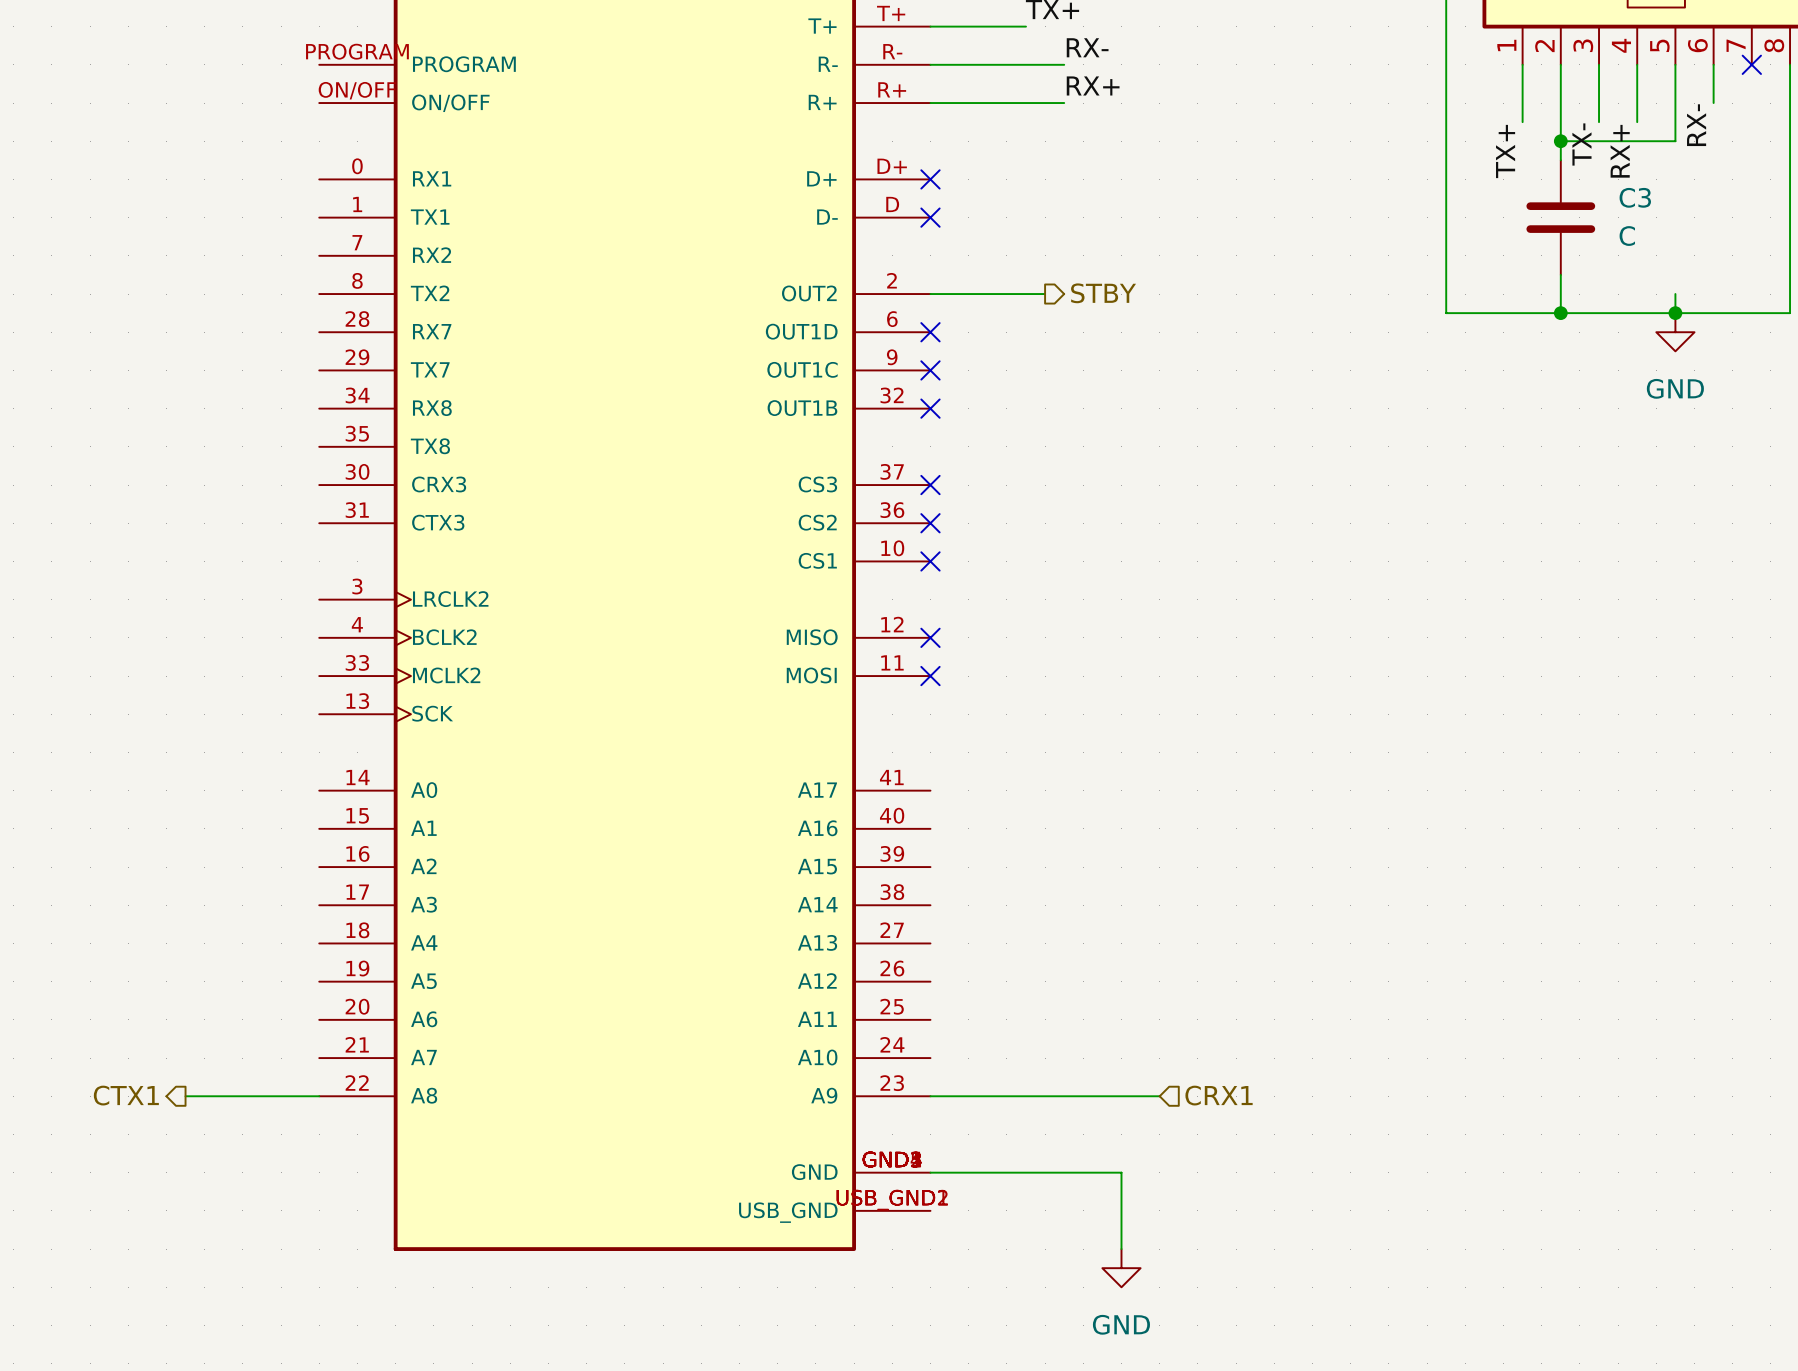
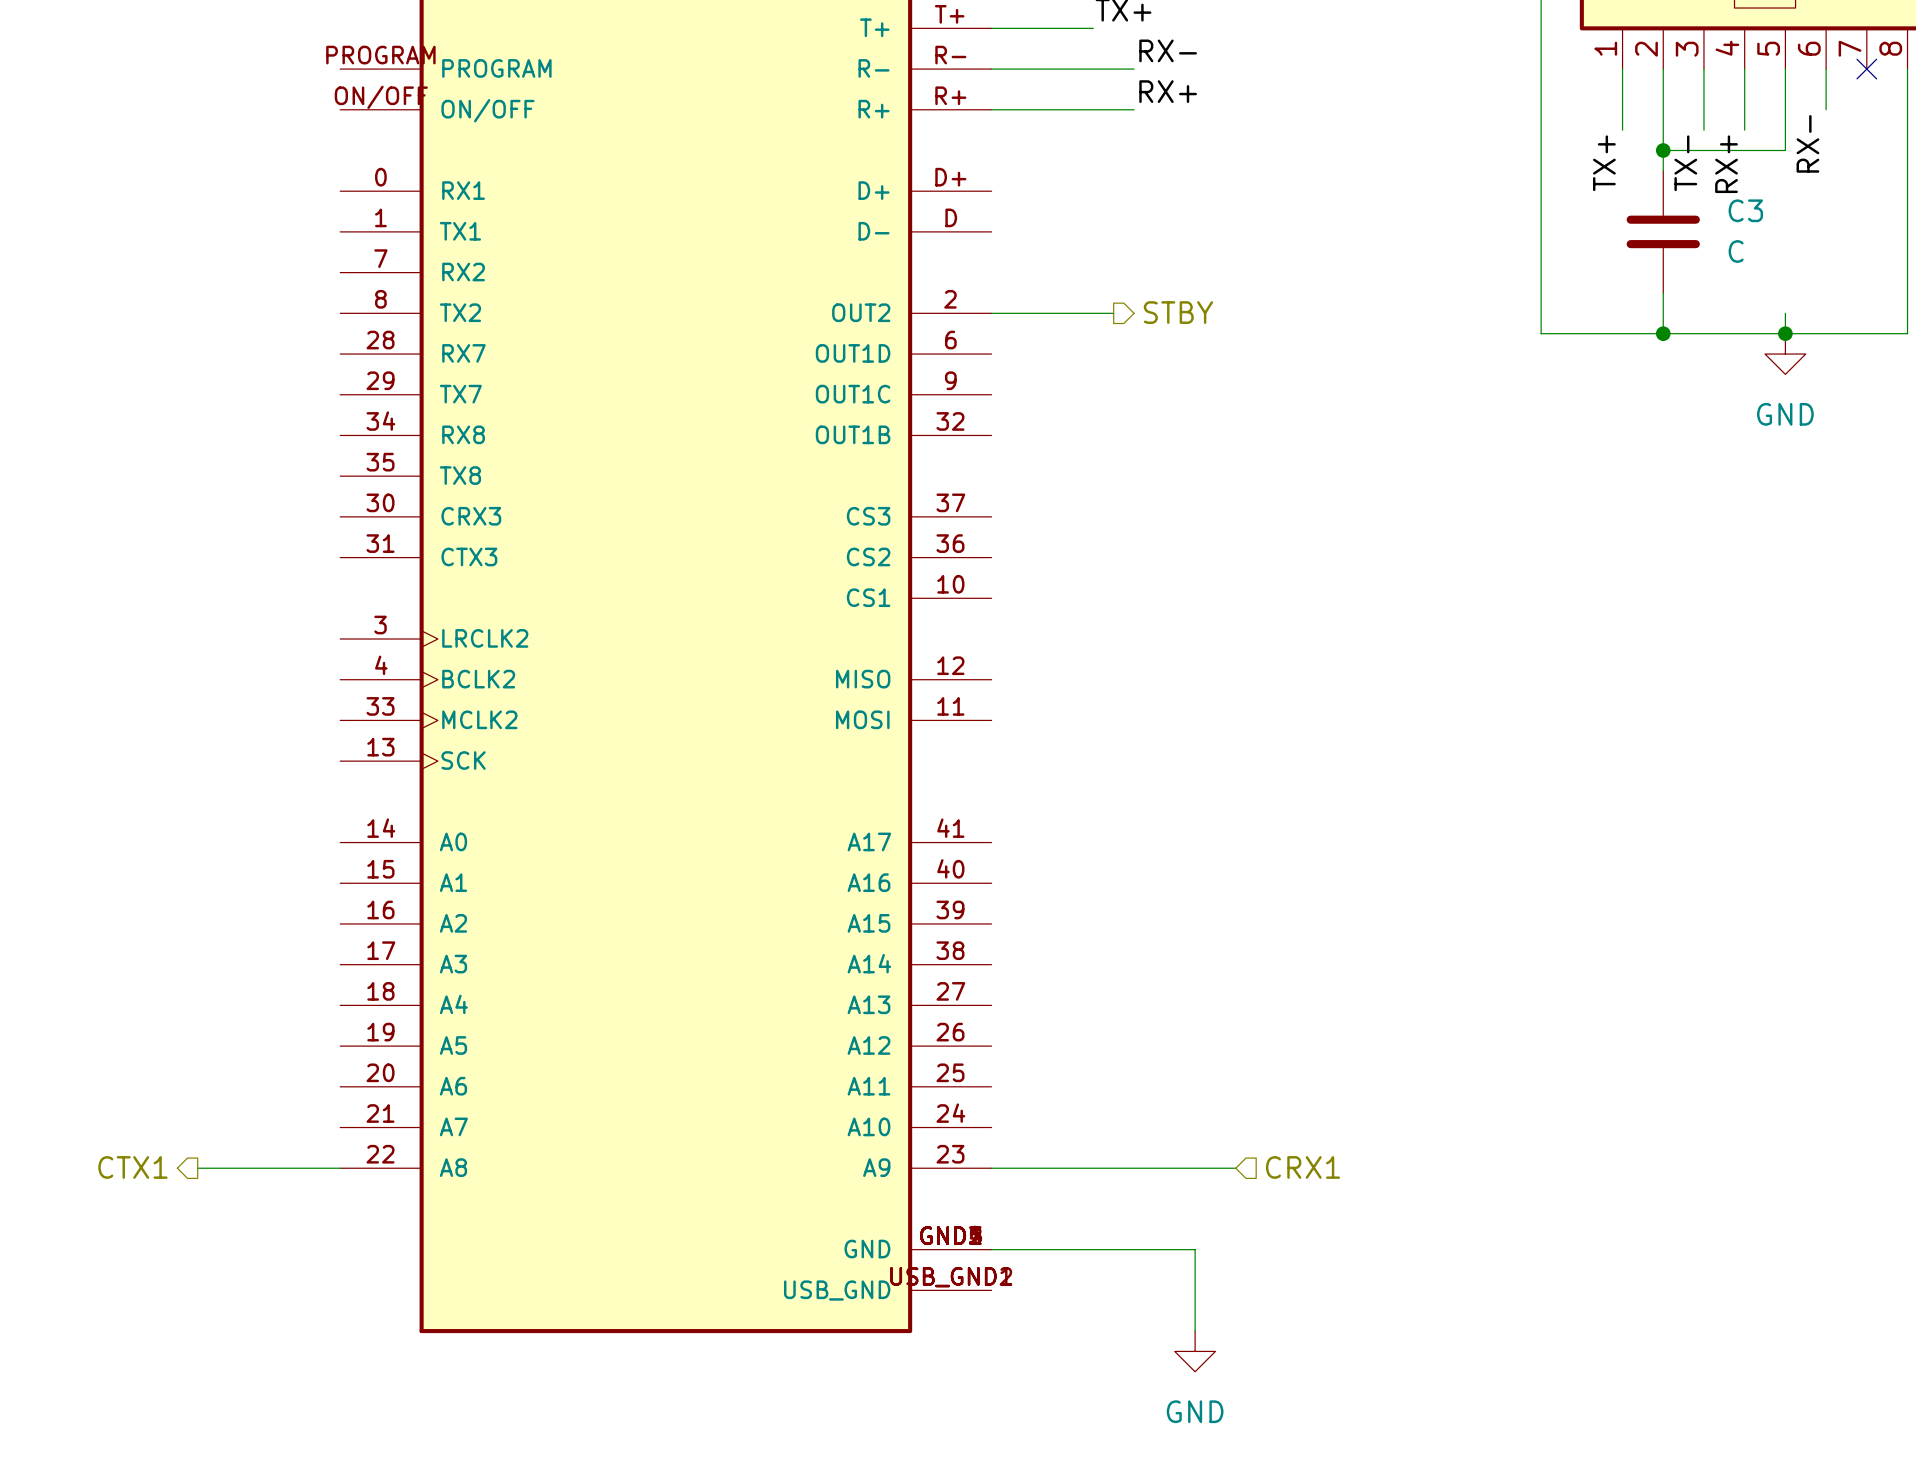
no-connect mark: (930, 179) -> none
no-connect mark: (930, 217) -> none
no-connect mark: (930, 332) -> none
no-connect mark: (930, 370) -> none
no-connect mark: (930, 408) -> none
no-connect mark: (930, 485) -> none
no-connect mark: (930, 523) -> none
no-connect mark: (930, 561) -> none
no-connect mark: (930, 637) -> none
no-connect mark: (930, 676) -> none

